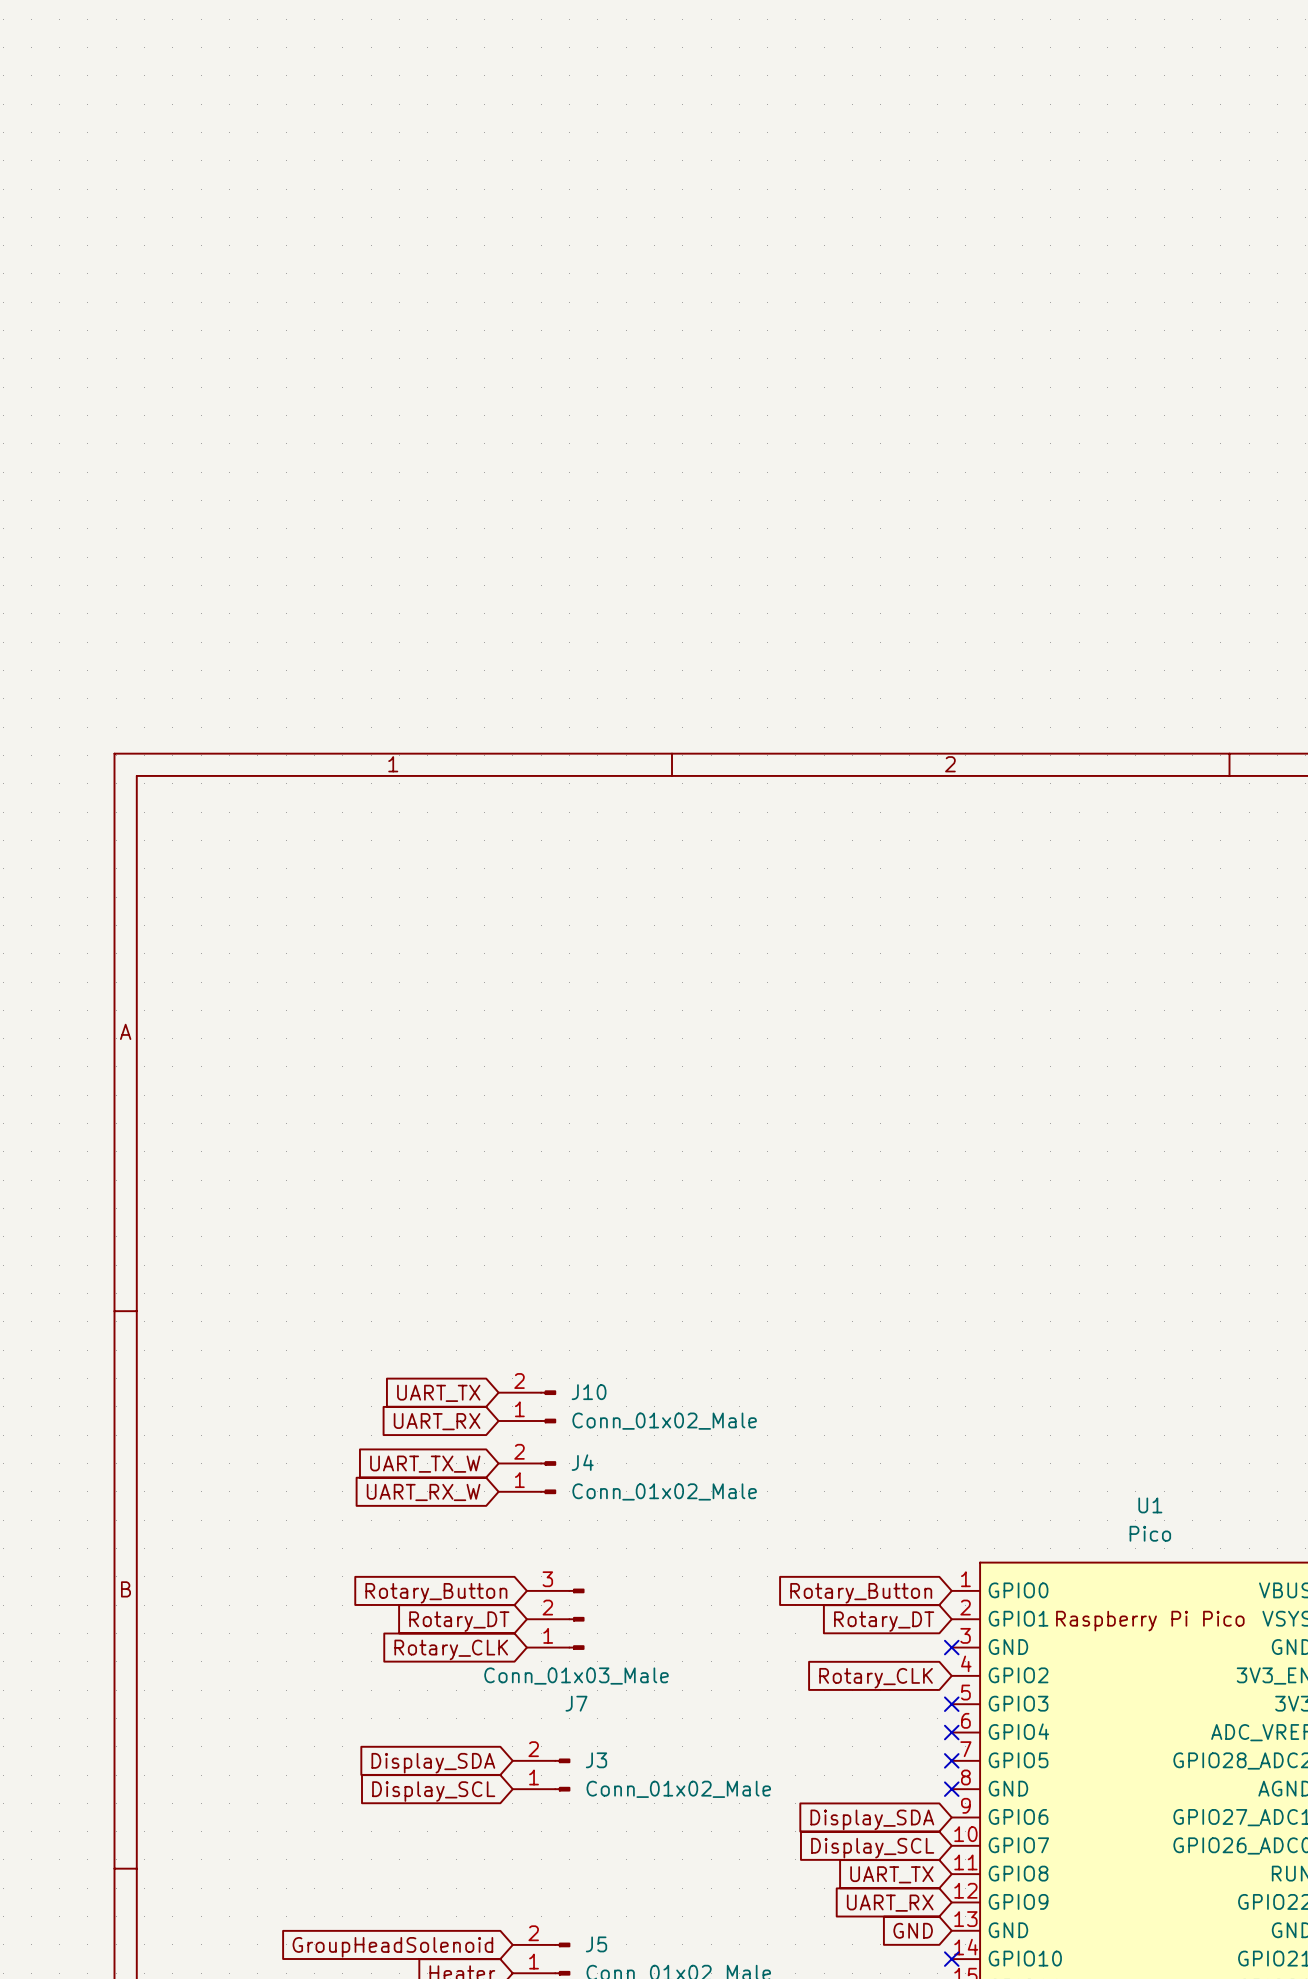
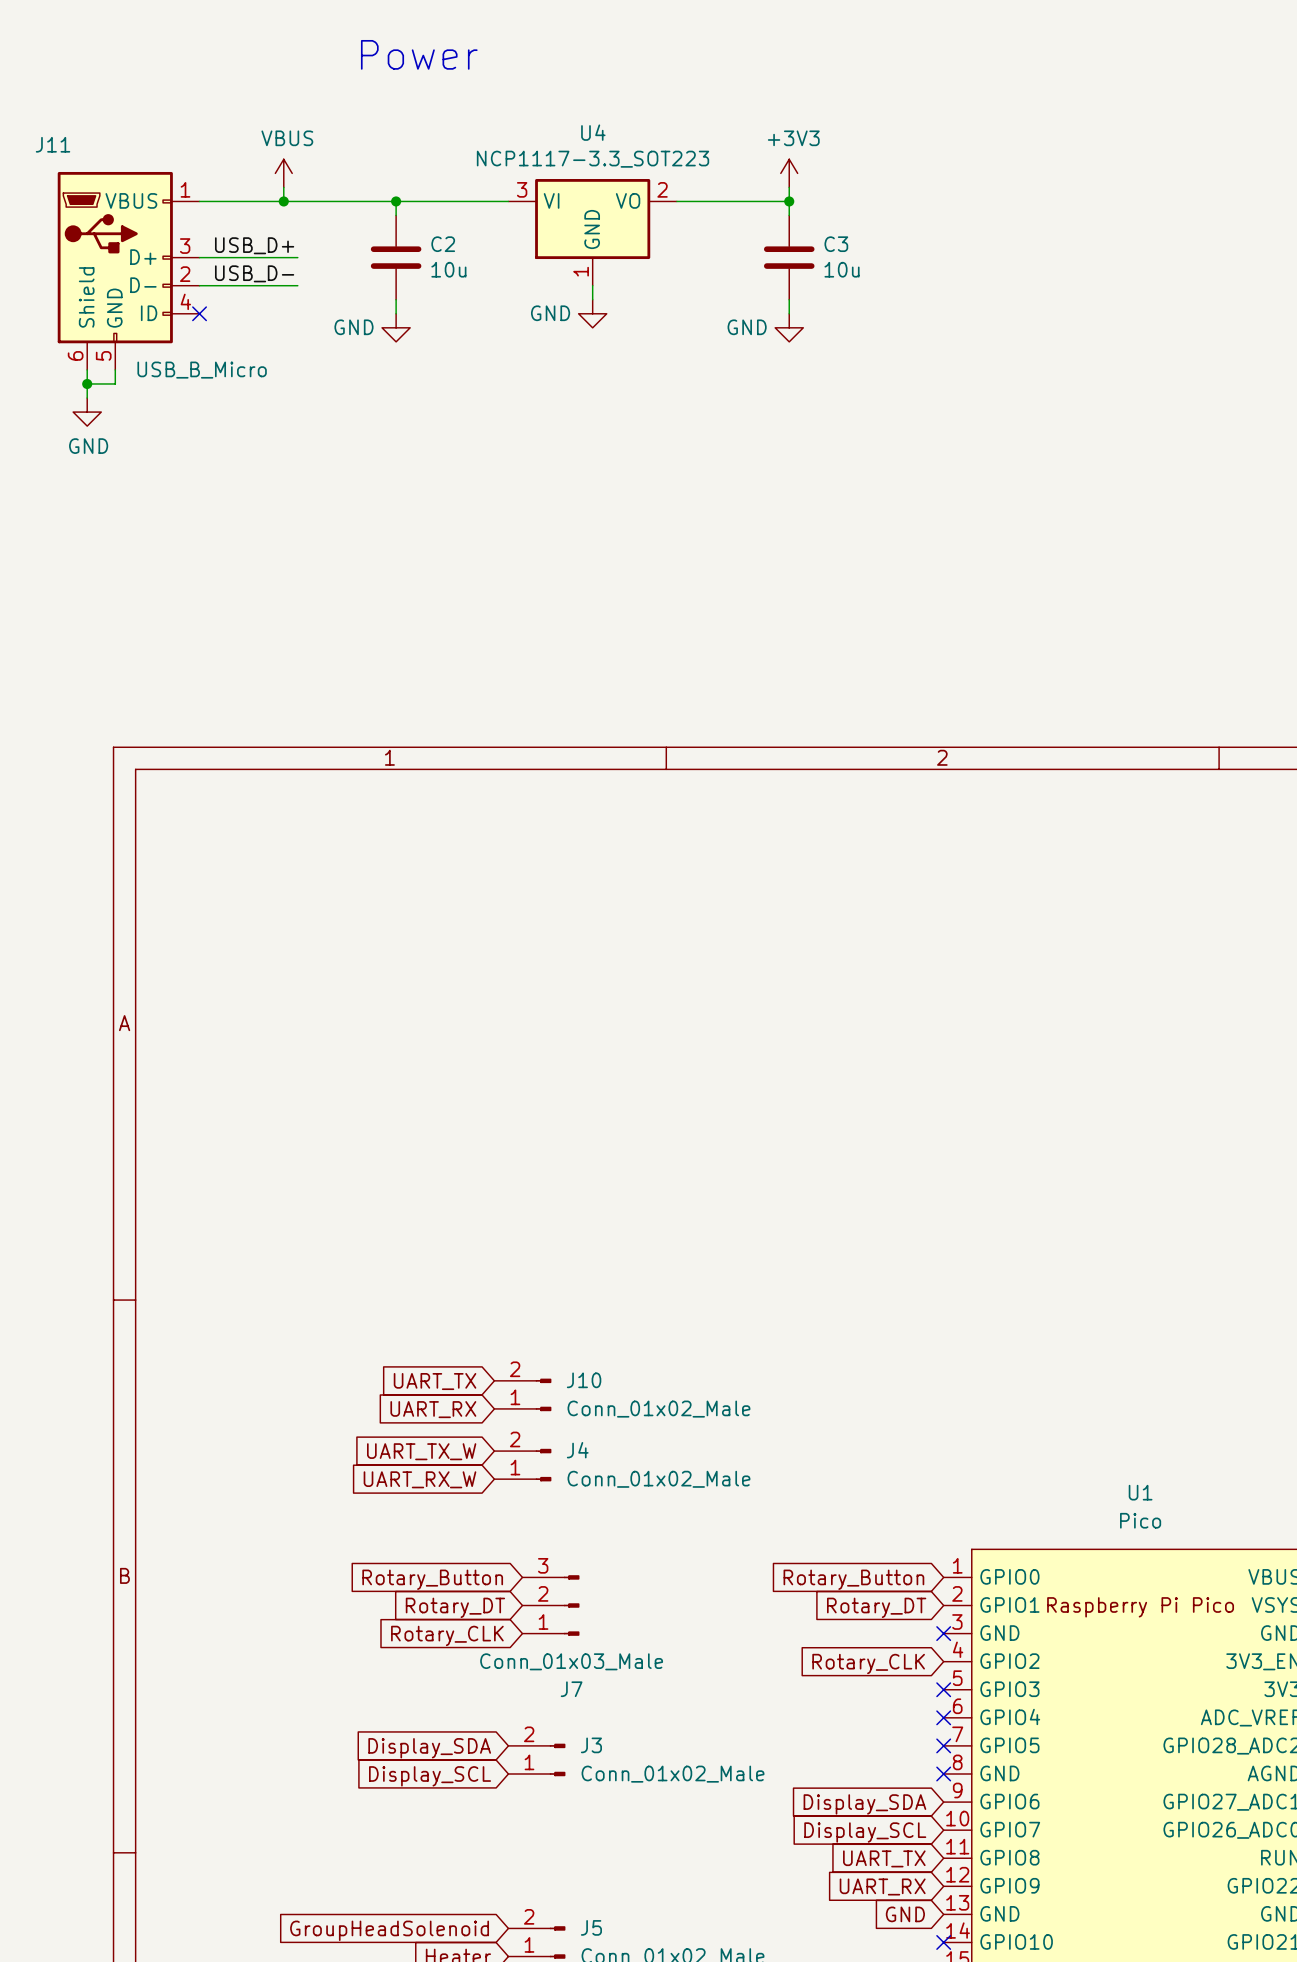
text: none -> Power (419, 54)
power symbol: none -> VBUS (283, 173)
power symbol: none -> +3V3 (789, 173)
wire: none -> (283, 187) (283, 201)
wire: none -> (789, 187) (789, 215)
wire: none -> (199, 201) (508, 201)
junction: none -> (283, 201)
wire: none -> (396, 201) (396, 215)
junction: none -> (396, 201)
wire: none -> (676, 201) (789, 201)
junction: none -> (789, 201)
U4: none -> NCP1117-3.3_SOT223 (592, 232)
label: none -> USB_D+ (254, 245)
wire: none -> (199, 257) (297, 257)
C2: none -> 10u (396, 257)
C3: none -> 10u (789, 257)
J11: none -> USB_B_Micro (128, 270)
label: none -> USB_D- (254, 273)
wire: none -> (199, 285) (297, 285)
wire: none -> (592, 285) (592, 299)
wire: none -> (396, 299) (396, 313)
wire: none -> (789, 299) (789, 313)
no-connect mark: none -> (199, 313)
power symbol: none -> GND (592, 313)
power symbol: none -> GND (396, 327)
power symbol: none -> GND (789, 327)
wire: none -> (87, 369) (87, 398)
wire: none -> (115, 369) (115, 383) (87, 383)
junction: none -> (87, 383)
power symbol: none -> GND (87, 412)

